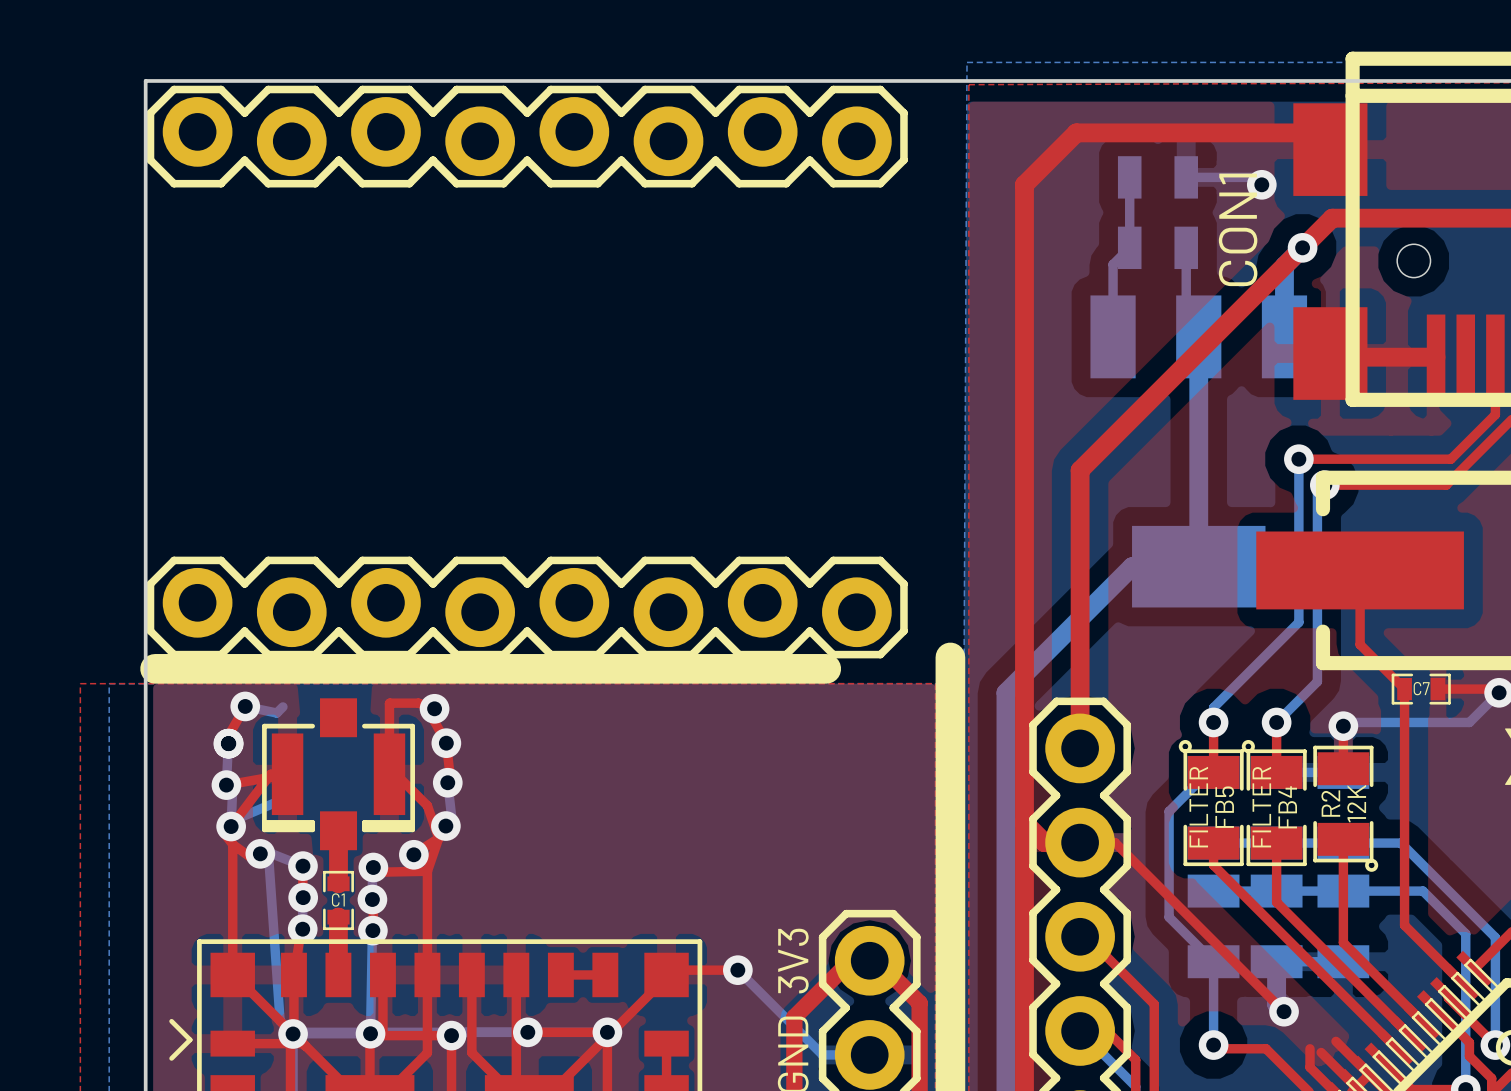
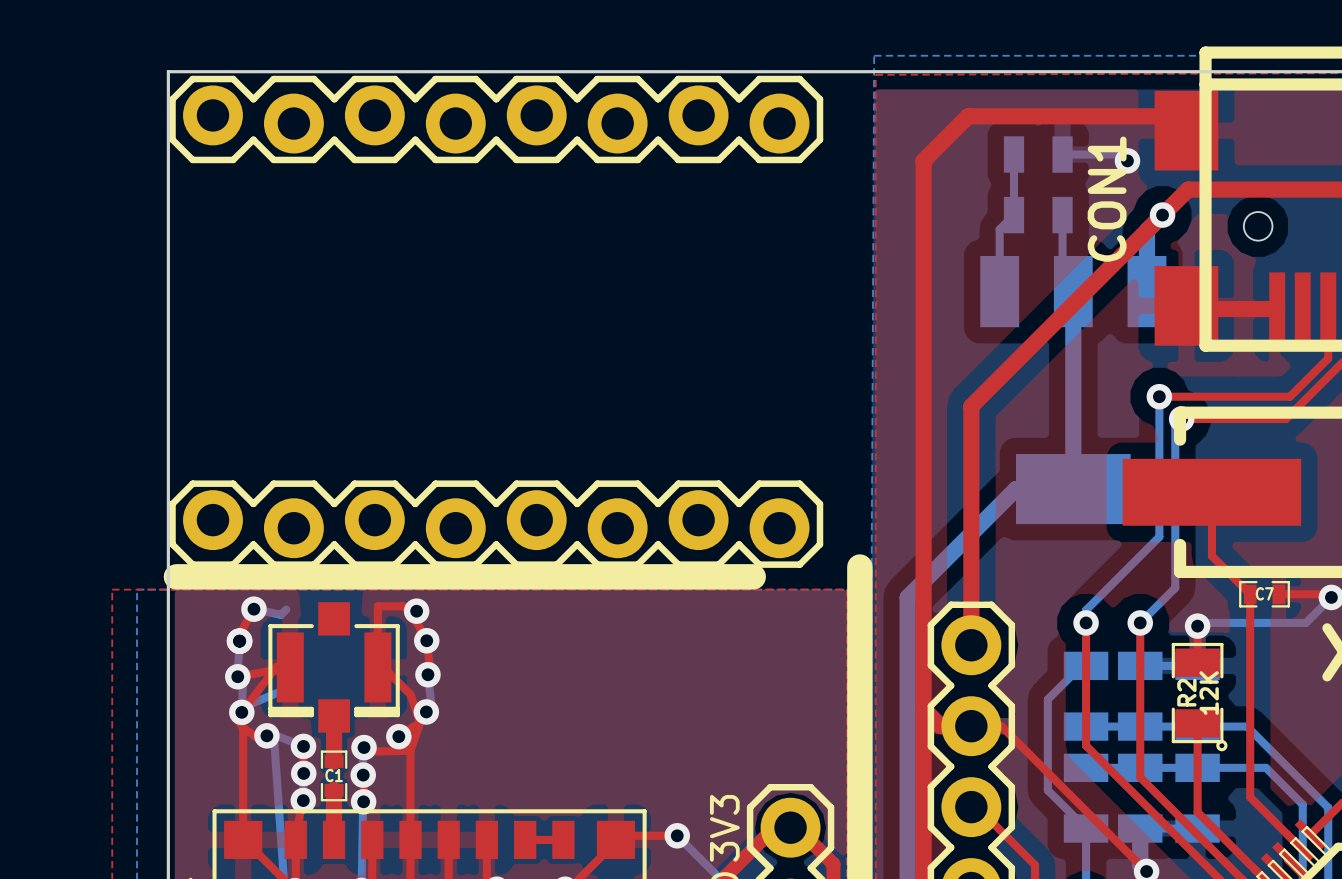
top track: none -> (1086, 665) (1086, 726)
top track: none -> (1140, 665) (1140, 726)
FB5: FILTER (1211, 803) -> none
FB4: FILTER (1274, 803) -> none

